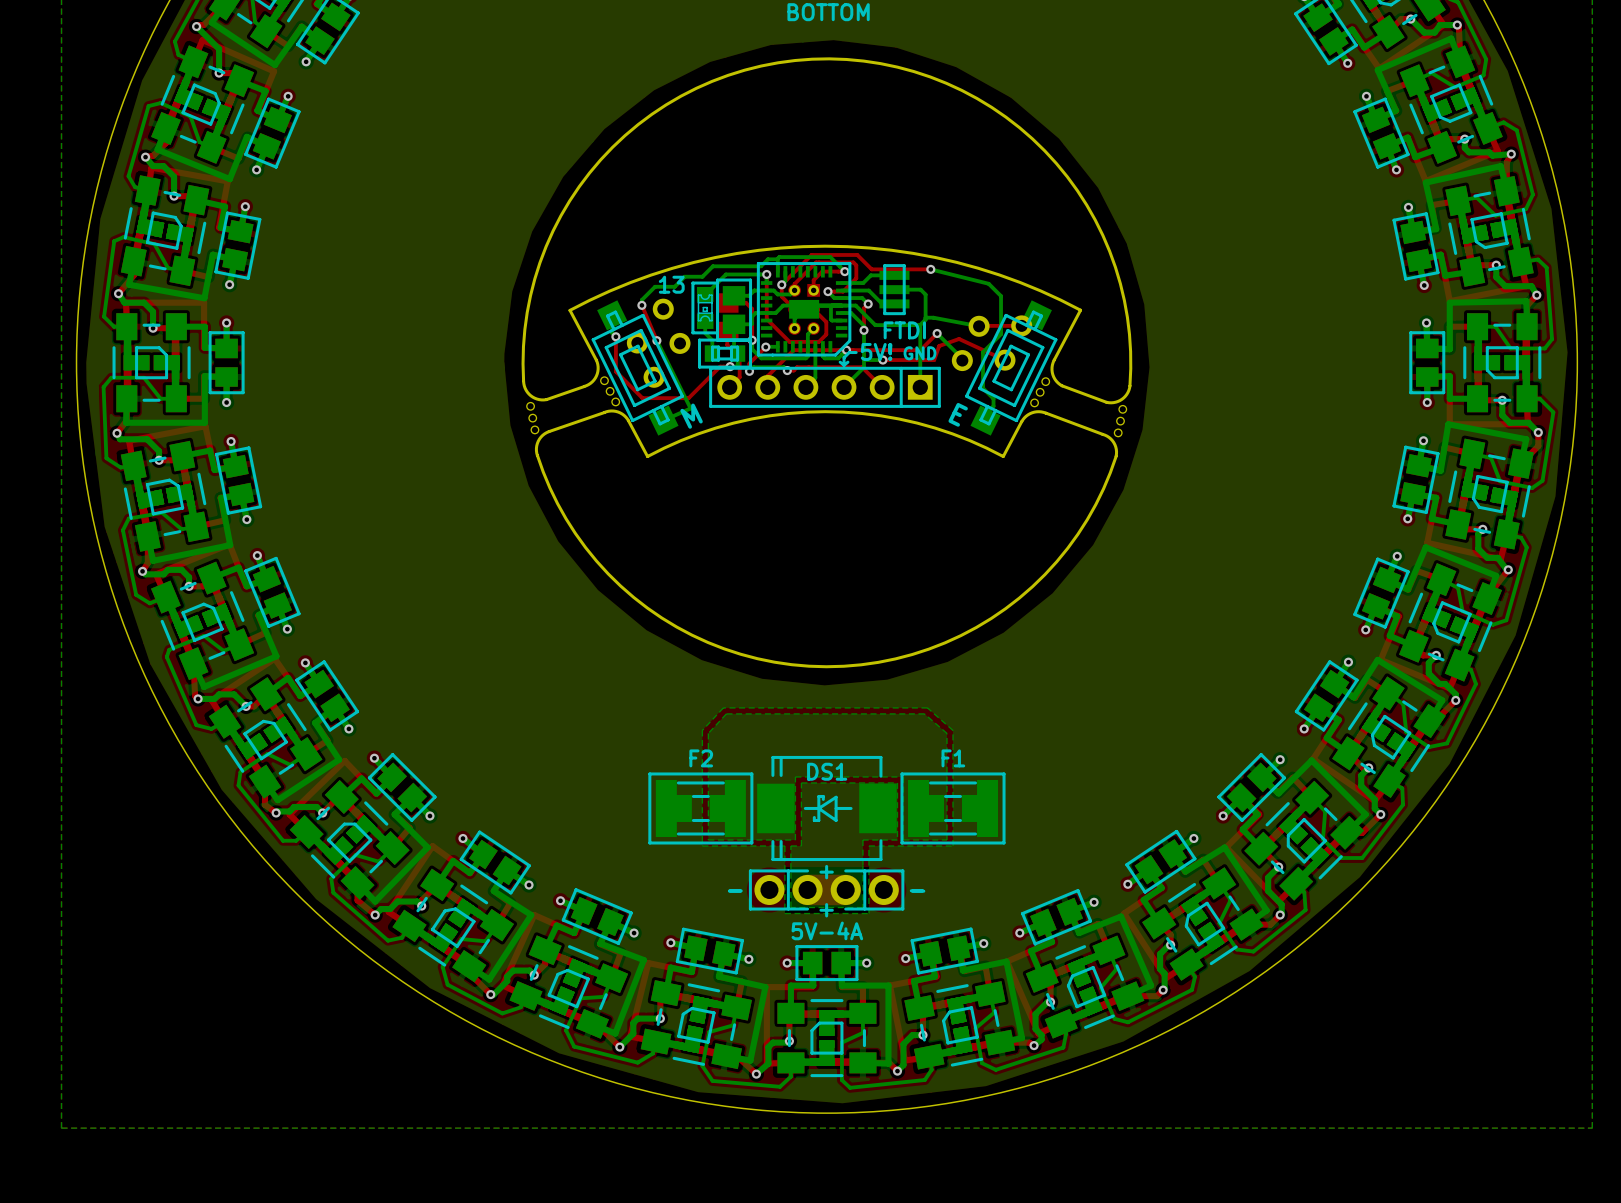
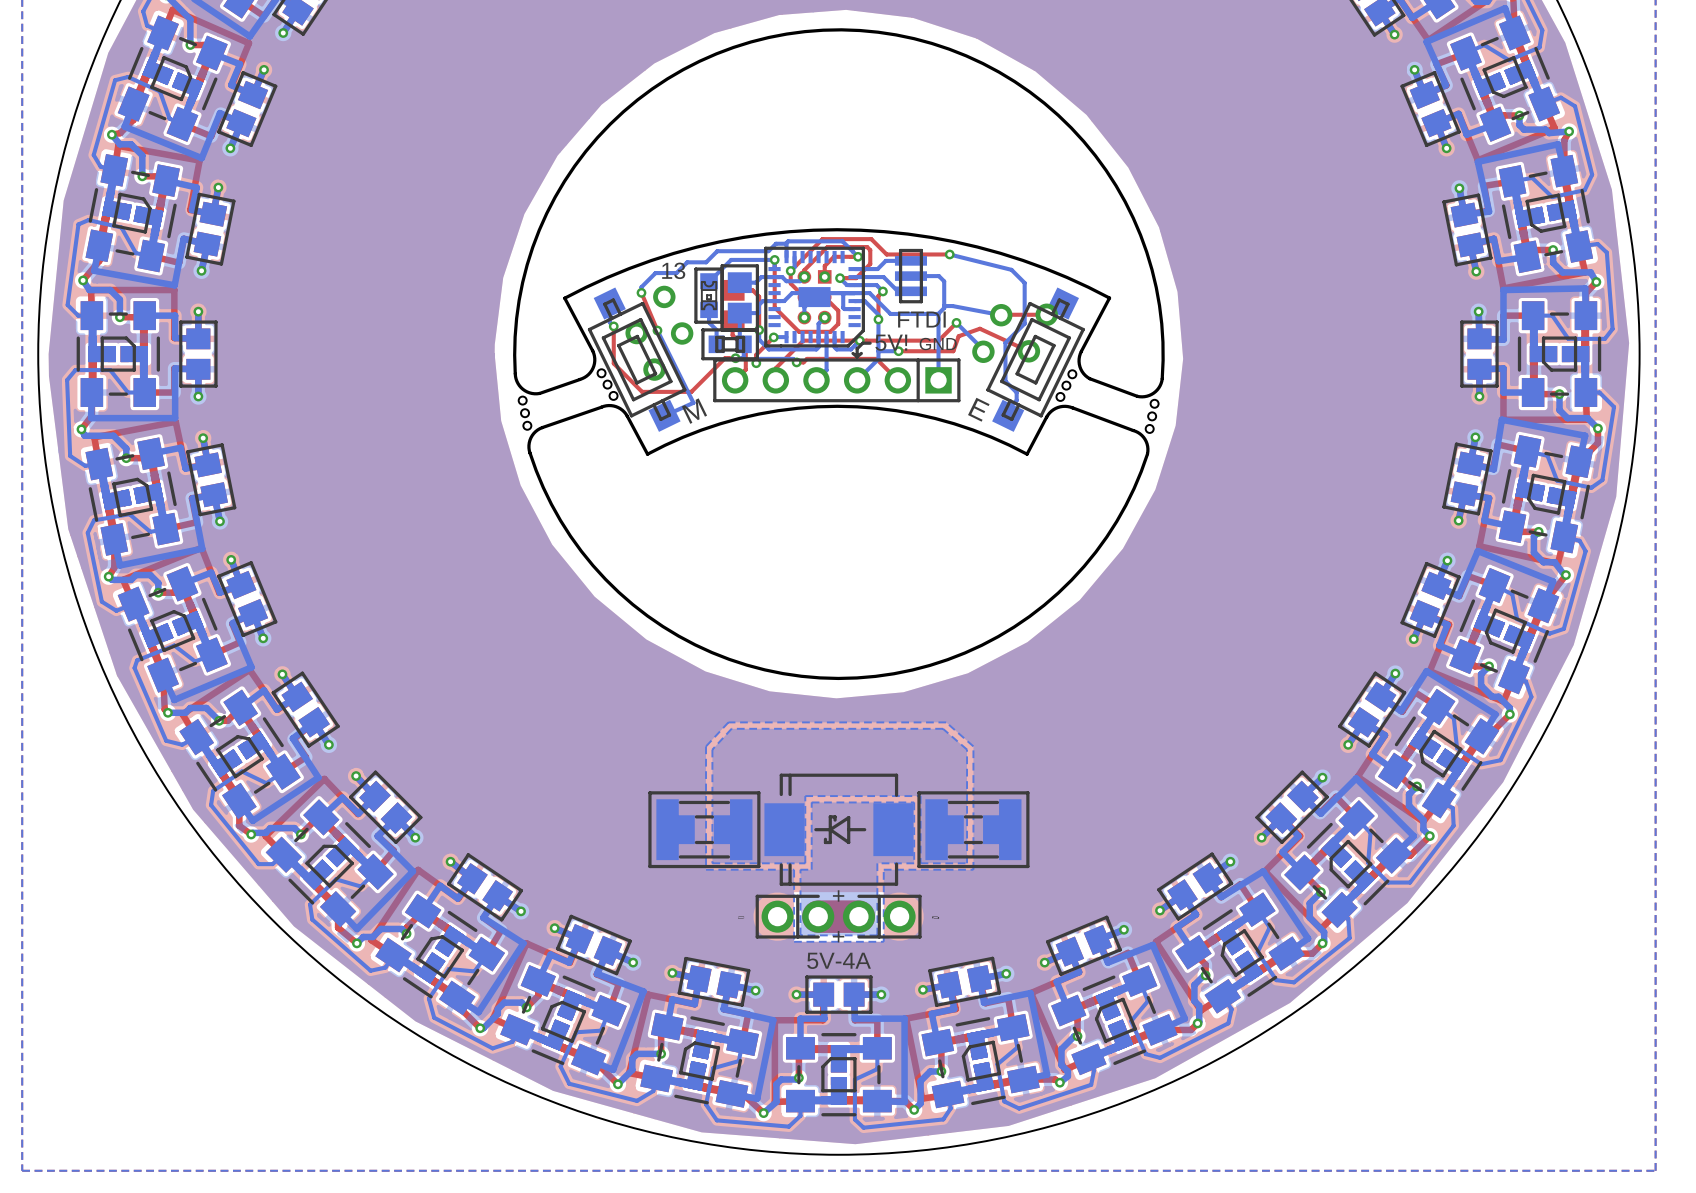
F2 name: F2 (701, 758) -> none
F1 name: F1 (953, 758) -> none
DS1 name: DS1 (827, 771) -> none

